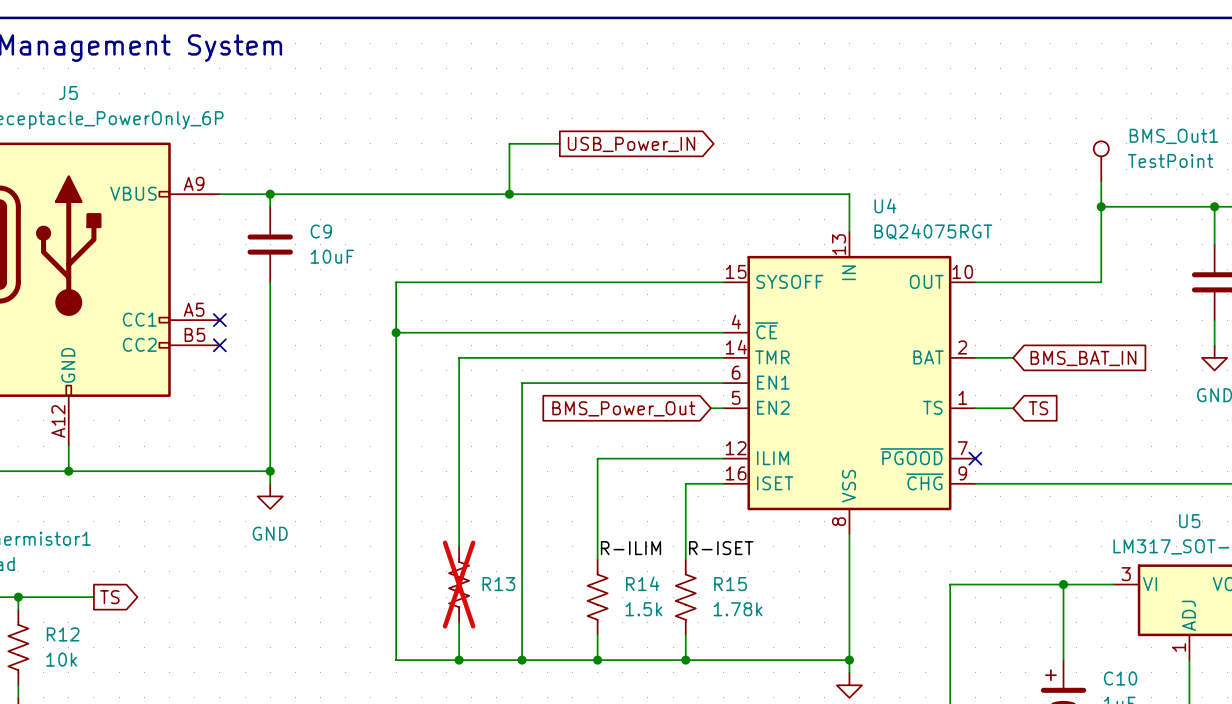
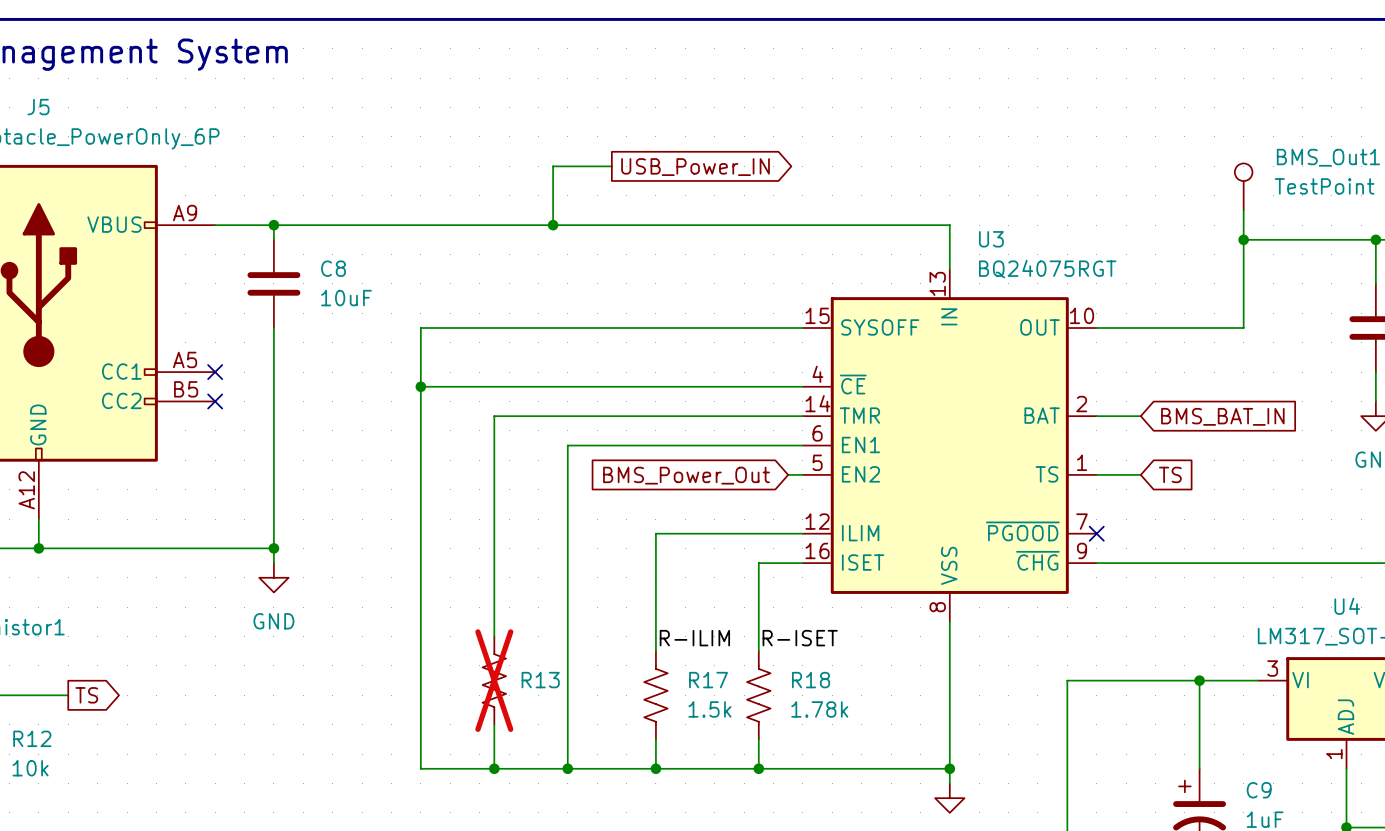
U4 name: U4 (885, 206) -> U3 (991, 239)
C9 name: C9 (321, 231) -> C8 (333, 268)
U5 name: U5 (1189, 521) -> U4 (1347, 606)
R14 name: R14 (642, 583) -> R17 (708, 680)
R15 name: R15 (730, 584) -> R18 (811, 680)
C10 name: C10 (1120, 678) -> C9 (1259, 790)

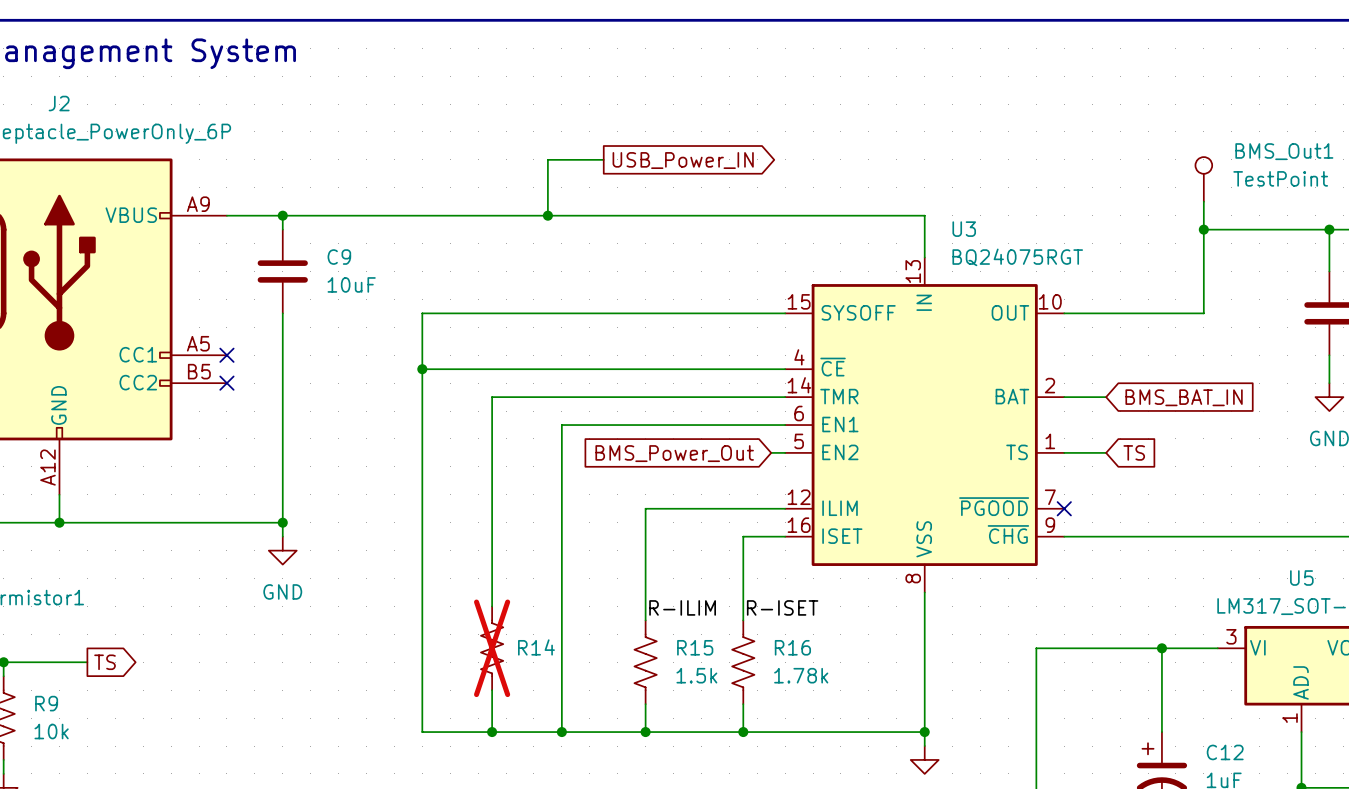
J5 name: J5 (38, 107) -> J2 (59, 103)
C8 name: C8 (333, 268) -> C9 (339, 257)
U4 name: U4 (1347, 606) -> U5 (1301, 578)
R13 name: R13 (540, 680) -> R14 (536, 647)
R17 name: R17 (708, 680) -> R15 (695, 647)
R18 name: R18 (811, 680) -> R16 (792, 647)
R12 name: R12 (32, 738) -> R9 (46, 703)
C9 name: C9 (1259, 790) -> C12 (1225, 752)

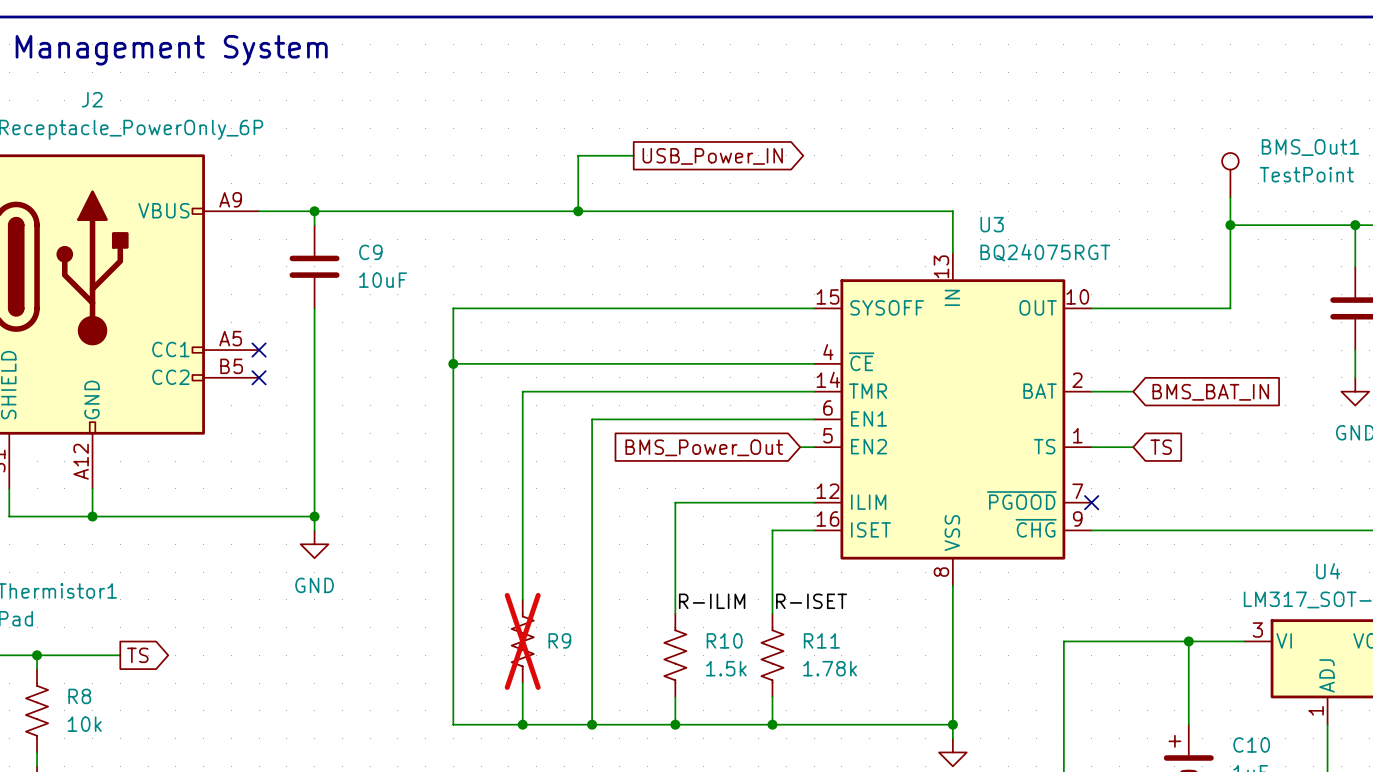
U5 name: U5 (1301, 578) -> U4 (1328, 571)
R14 name: R14 (536, 647) -> R9 (559, 640)
R15 name: R15 (695, 647) -> R10 (724, 640)
R16 name: R16 (792, 647) -> R11 (821, 640)
R9 name: R9 (46, 703) -> R8 (79, 696)
C12 name: C12 (1225, 752) -> C10 (1251, 744)

